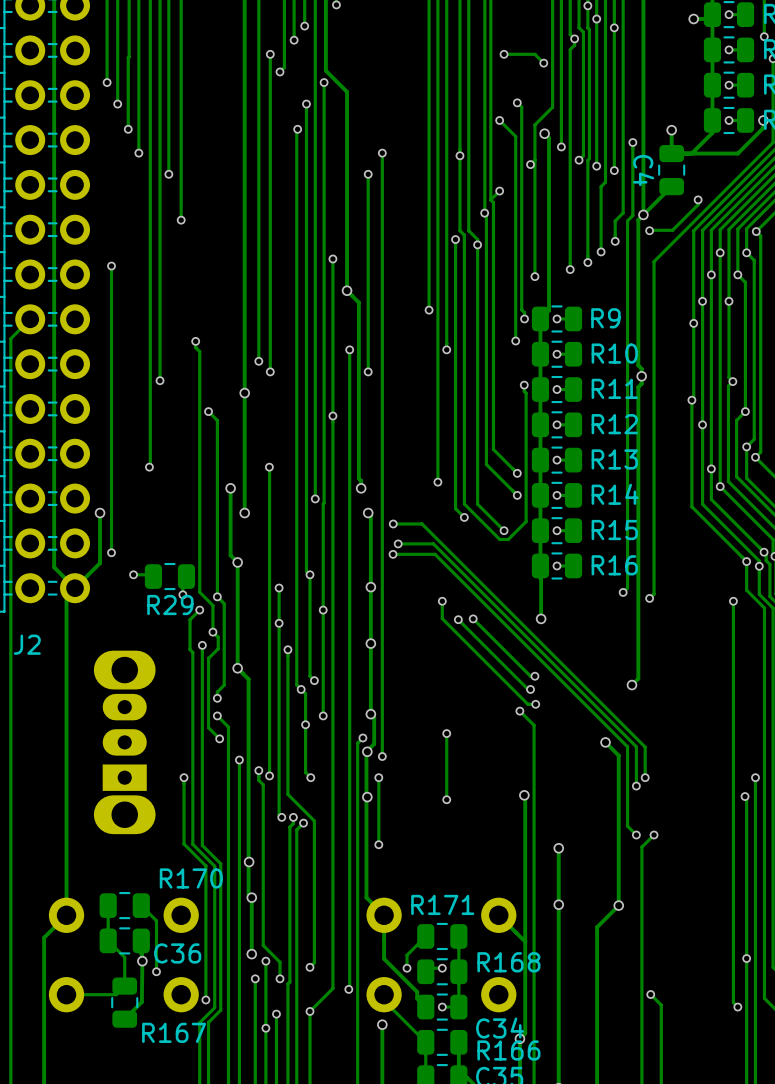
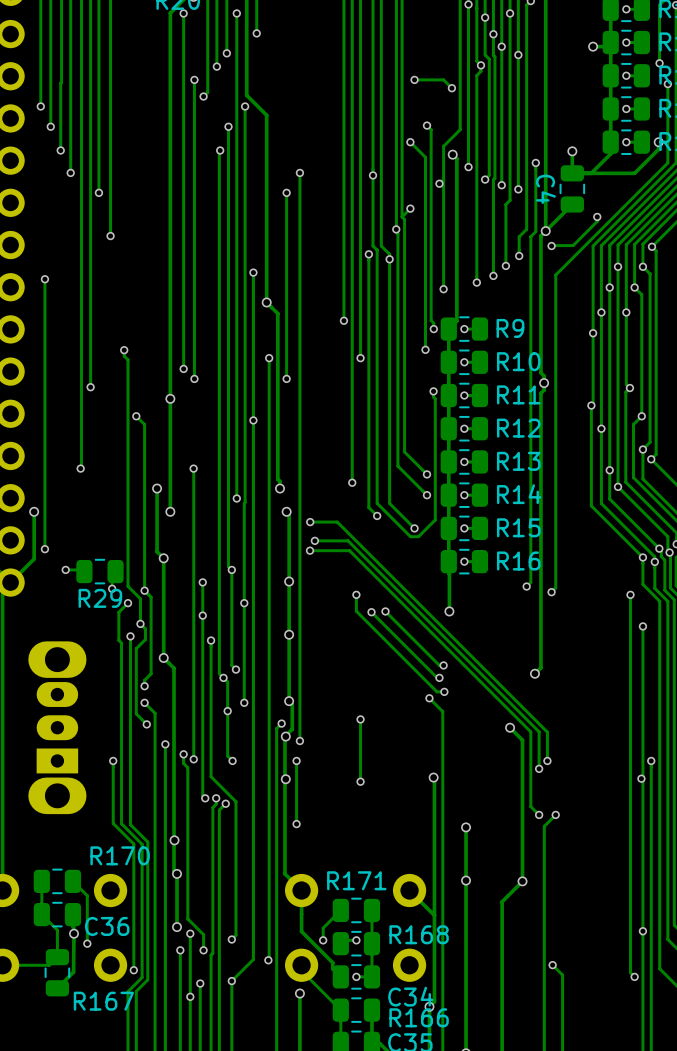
track: none -> (642, 626) (642, 777) (641, 778)
via: none -> (642, 626)

